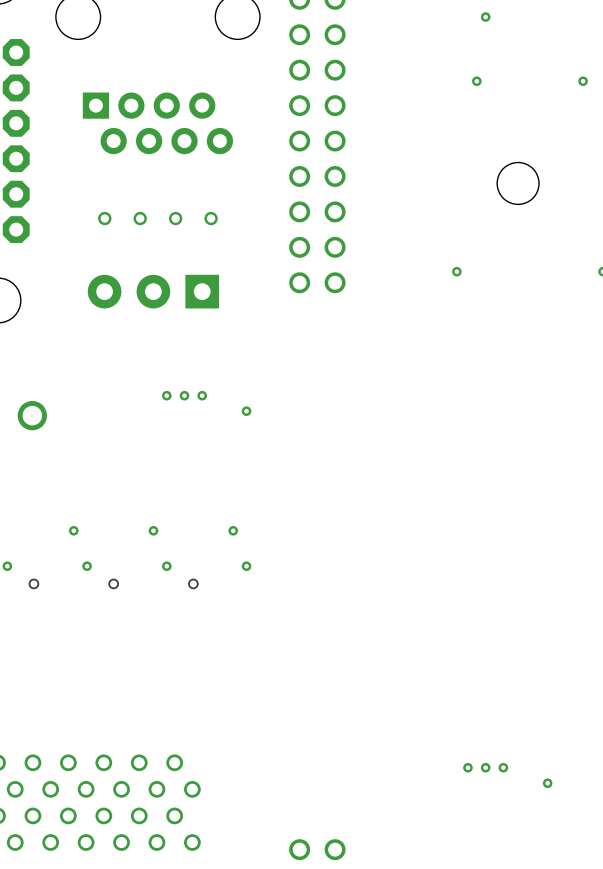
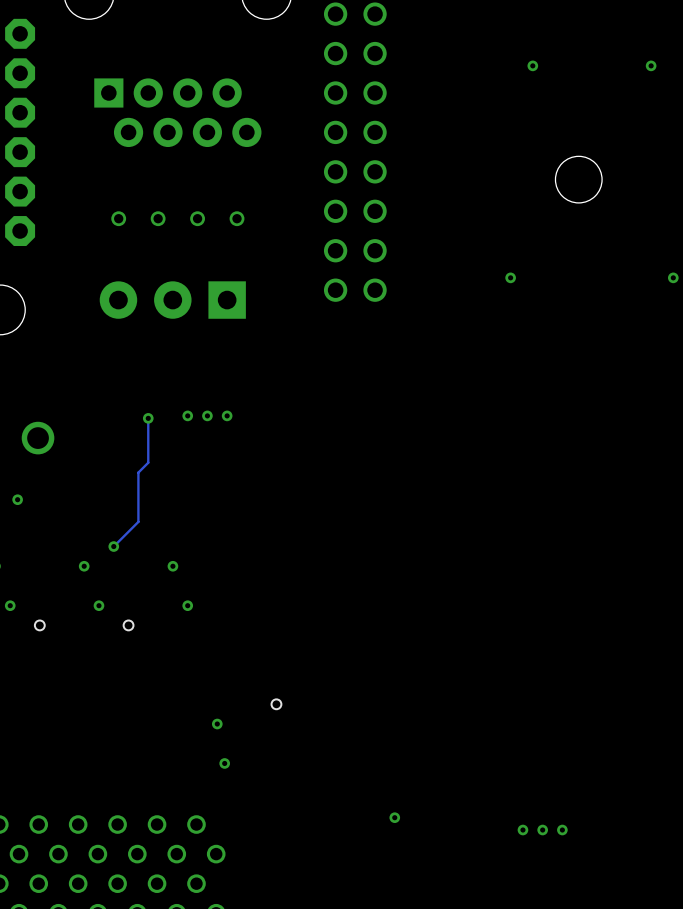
track: none -> (148, 418) (148, 462) (138, 472) (138, 521) (113, 546)
via: none -> (148, 418)
via: (246, 411) -> none
via: none -> (17, 499)
via: none -> (113, 546)
via: (233, 530) -> none
via: (246, 566) -> none
part position: (193, 583) -> (276, 704)
via: none -> (217, 724)
via: none -> (224, 763)
via: none -> (394, 817)
via: (547, 783) -> none

